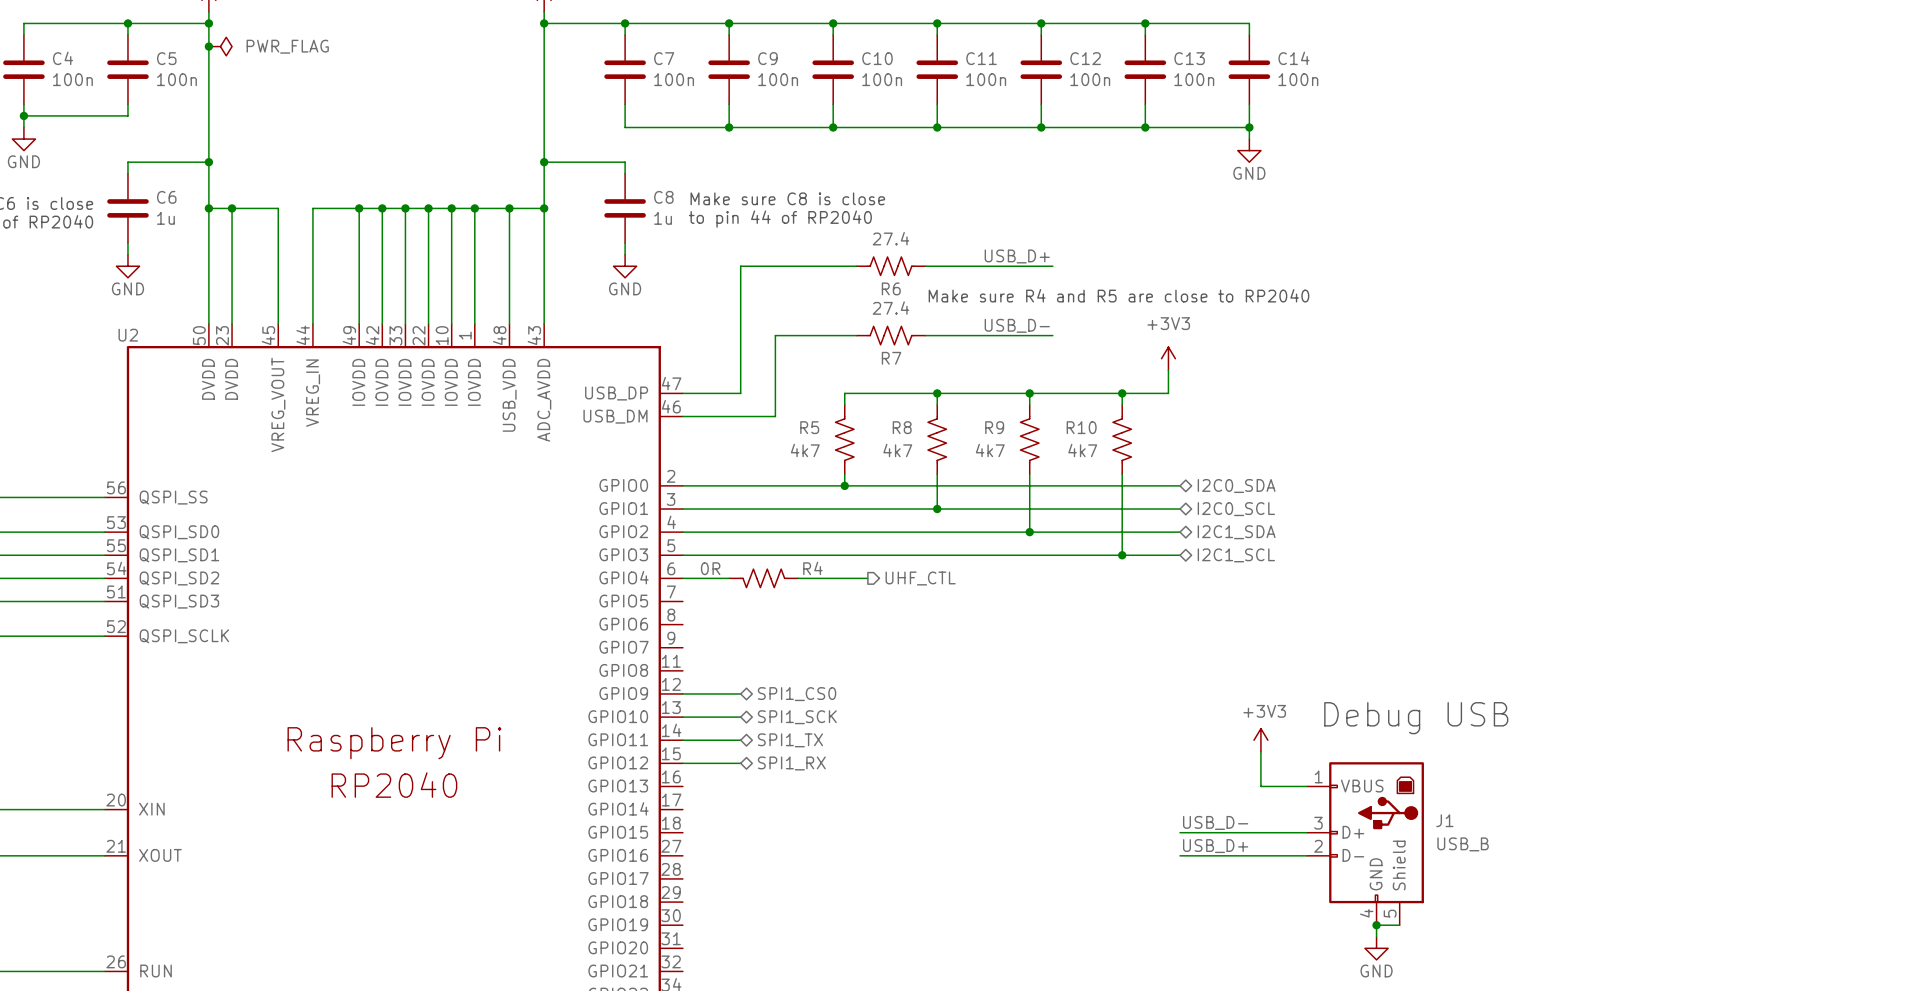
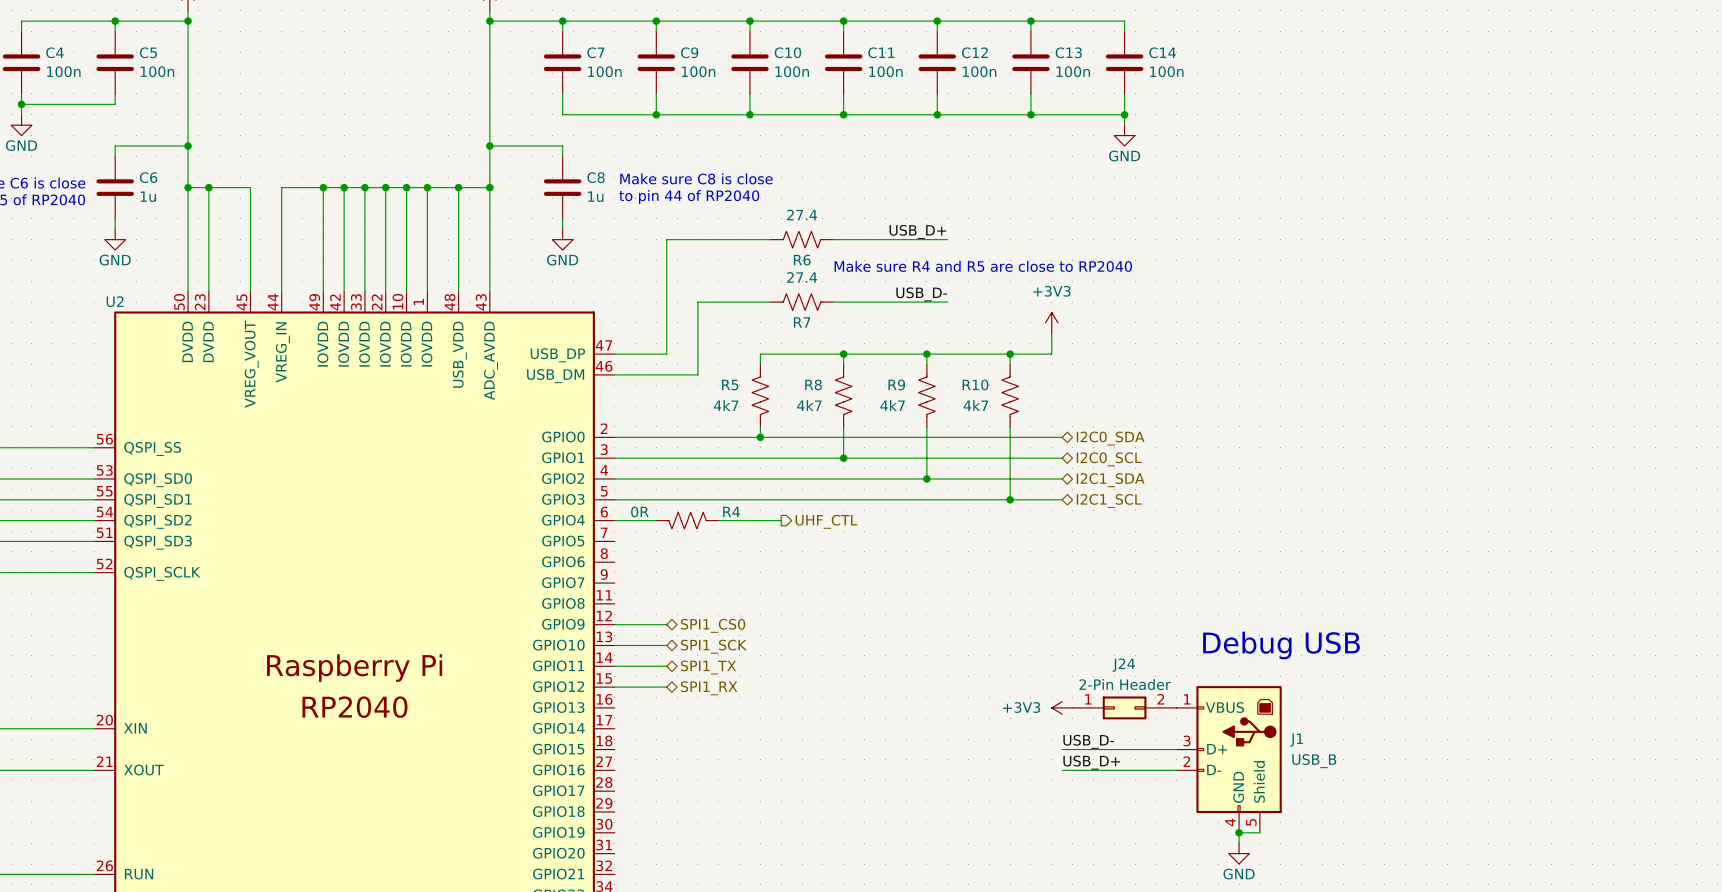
junction: (208, 46) -> none
power symbol: PWR_FLAG (220, 46) -> none
power symbol text position: +3V3 (1264, 711) -> +3V3 (1021, 707)
power symbol rotation: 0° (1260, 740) -> 90° counterclockwise (1062, 707)
power symbol position: +3V3 (1260, 740) -> +3V3 (1062, 707)
J24: none -> 2-Pin Header (1124, 707)

